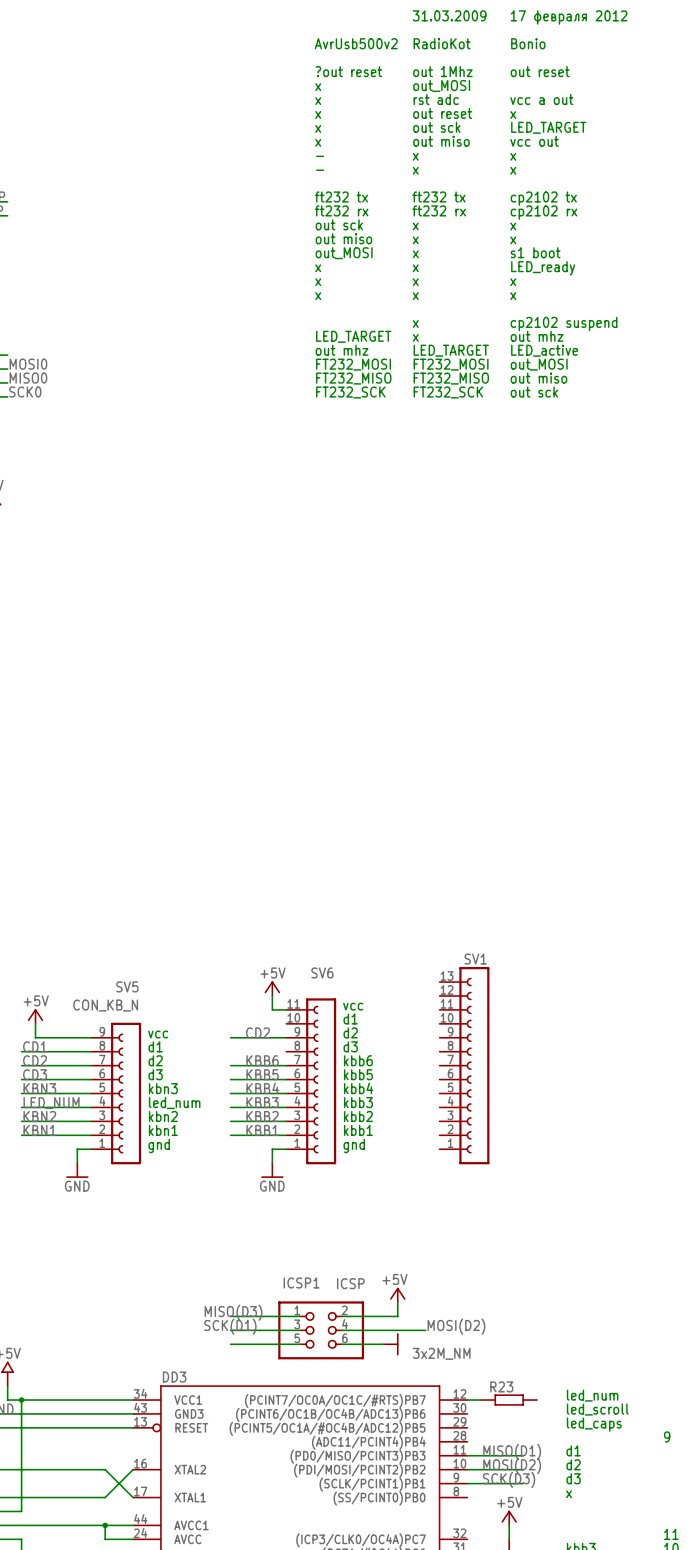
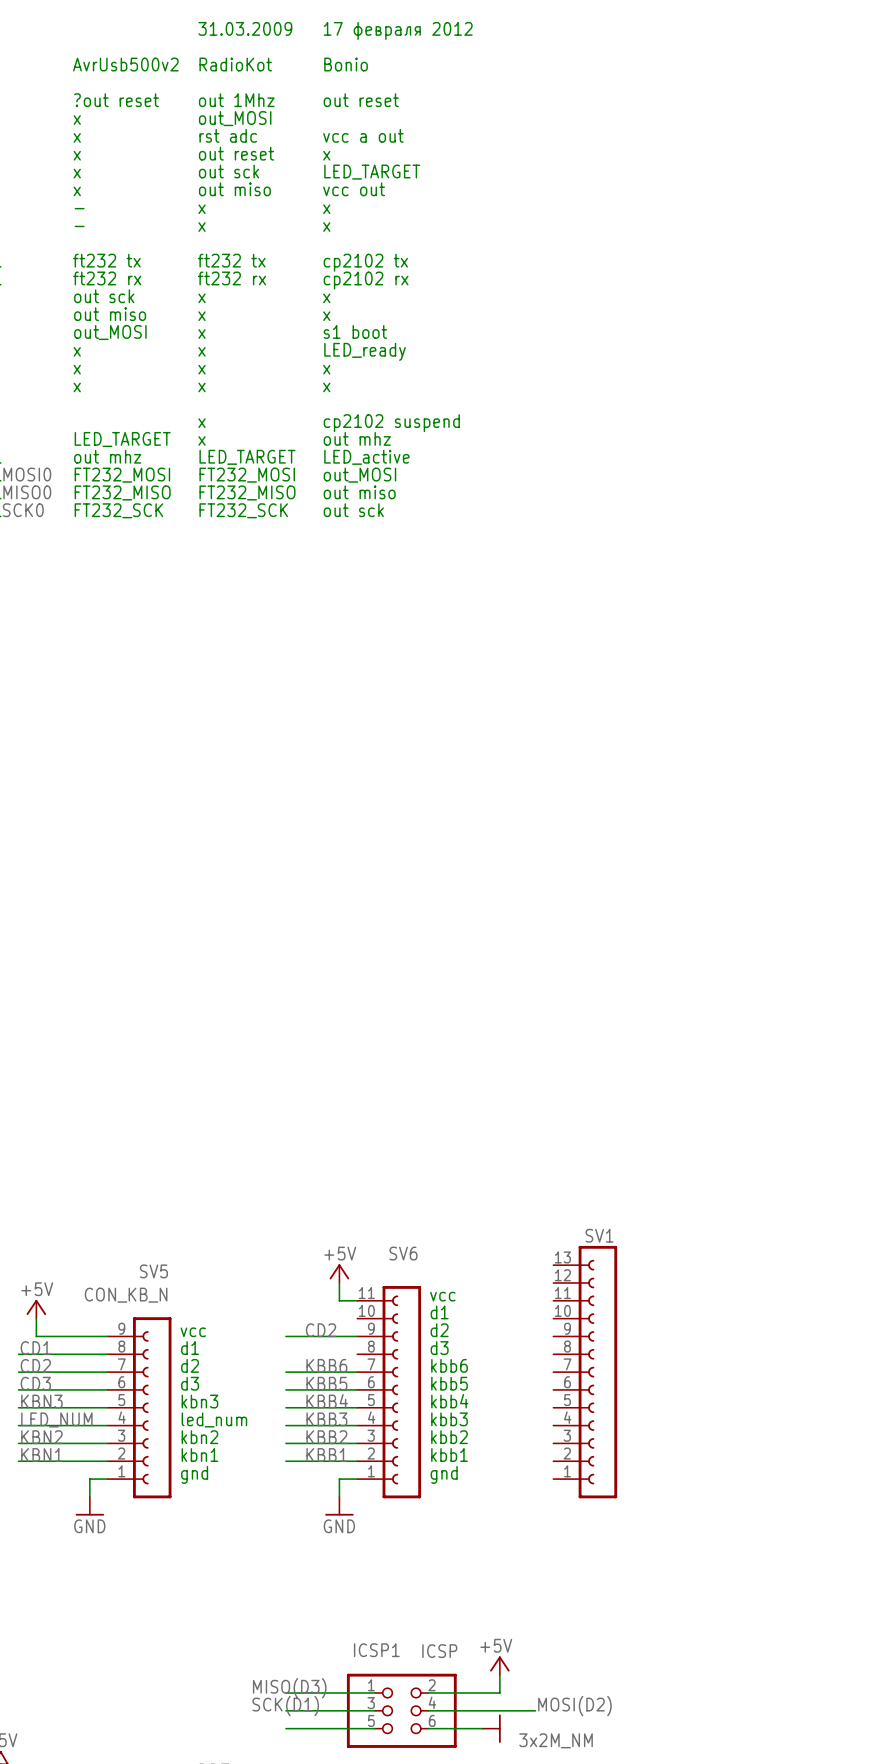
text: none -> 31.03.2009 (245, 28)
text: 31.03.2009 (449, 15) -> none
text: none -> 17 февраля 2012 (398, 30)
text: 17 февраля 2012 (569, 17) -> none
text: none -> AvrUsb500v2 (125, 64)
text: none -> RadioKot (235, 64)
text: none -> Bonio (346, 64)
text: AvrUsb500v2 (356, 43) -> none
text: RadioKot (442, 43) -> none
text: Bonio (528, 43) -> none
text: none -> ?out reset (116, 100)
text: none -> out 1Mhz (236, 100)
text: ?out reset (348, 71) -> out reset (361, 100)
text: out 1Mhz (442, 71) -> none
text: out reset (540, 71) -> none
text: none -> out_MOSI (235, 118)
text: out_MOSI (441, 85) -> none
text: none -> x (77, 120)
text: x (318, 87) -> none
text: none -> rst adc (228, 135)
text: none -> vcc a out (363, 135)
text: rst adc (436, 99) -> none
text: vcc a out (541, 99) -> none
text: none -> x (77, 137)
text: x (318, 101) -> none
text: none -> out reset (236, 153)
text: out reset (442, 113) -> none
text: none -> x (77, 155)
text: none -> x (326, 155)
text: x (318, 115) -> none
text: x (513, 115) -> none
text: none -> out sck (229, 171)
text: none -> LED_TARGET (372, 172)
text: out sck (436, 127) -> none
text: LED_TARGET (548, 127) -> none
text: none -> x (77, 173)
text: x (318, 128) -> none
text: none -> out miso (234, 189)
text: none -> vcc out (354, 189)
text: out miso (441, 141) -> none
text: vcc out (534, 141) -> none
text: none -> x (77, 191)
text: x (318, 142) -> none
text: none -> - (79, 208)
text: none -> x (202, 209)
text: none -> x (326, 209)
text: - (320, 156) -> none
text: x (415, 156) -> none
text: x (513, 156) -> none
text: none -> - (79, 226)
text: none -> x (202, 227)
text: none -> x (326, 227)
text: - (320, 170) -> none
text: x (415, 170) -> none
text: x (513, 170) -> none
text: none -> ft232 tx (106, 260)
text: none -> ft232 tx (231, 260)
text: ft232 tx (341, 196) -> none
text: ft232 tx (438, 196) -> none
text: none -> cp2102 tx (365, 262)
text: cp2102 tx (543, 198) -> none
text: none -> ft232 rx (107, 278)
text: none -> ft232 rx (231, 278)
text: ft232 rx (341, 210) -> none
text: ft232 rx (439, 210) -> none
text: none -> cp2102 rx (366, 280)
text: cp2102 rx (544, 212) -> none
text: none -> out sck (104, 296)
text: out sck (339, 224) -> none
text: none -> x (202, 298)
text: none -> x (326, 298)
text: x (415, 226) -> none
text: x (513, 226) -> none
text: none -> out miso (110, 314)
text: out miso (343, 238) -> none
text: none -> x (202, 316)
text: none -> x (326, 316)
text: x (415, 240) -> none
text: x (513, 240) -> none
text: none -> s1 boot (355, 331)
text: s1 boot (535, 252) -> none
text: none -> out_MOSI (110, 332)
text: out_MOSI (344, 253) -> none
text: none -> x (202, 334)
text: x (415, 254) -> none
text: none -> x (77, 351)
text: none -> x (202, 351)
text: none -> LED_ready (365, 351)
text: x (318, 268) -> none
text: x (415, 268) -> none
text: LED_ready (543, 268) -> none
text: none -> x (77, 369)
text: none -> x (202, 369)
text: none -> x (326, 369)
text: x (318, 282) -> none
text: x (415, 282) -> none
text: x (513, 282) -> none
text: none -> x (77, 387)
text: none -> x (202, 387)
text: none -> x (326, 387)
text: x (318, 296) -> none
text: x (415, 296) -> none
text: x (513, 296) -> none
text: none -> x (202, 423)
text: none -> cp2102 suspend (391, 423)
text: x (415, 324) -> none
text: cp2102 suspend (564, 324) -> none
text: none -> LED_TARGET (122, 439)
text: LED_TARGET (353, 336) -> none
text: out mhz (537, 336) -> none
text: none -> x (202, 440)
text: x (415, 337) -> none
text: none -> out mhz (107, 456)
text: none -> LED_TARGET (247, 457)
text: none -> LED_active (366, 457)
text position: out mhz (342, 350) -> out mhz (357, 438)
text: LED_TARGET (451, 350) -> none
text: LED_active (544, 350) -> none
text: none -> FT232_MOSI (122, 475)
text: none -> FT232_MOSI (247, 475)
text: none -> out_MOSI (359, 475)
text: FT232_MOSI (353, 364) -> none
text: FT232_MOSI (451, 364) -> none
text: out_MOSI (539, 364) -> none
text: none -> FT232_MISO (122, 492)
text: none -> FT232_MISO (247, 492)
text: none -> out miso (359, 492)
text: FT232_MISO (353, 378) -> none
text: FT232_MISO (451, 378) -> none
text: out miso (538, 378) -> none
text: none -> FT232_SCK (118, 510)
text: none -> FT232_SCK (243, 510)
text: none -> out sck (353, 510)
text: FT232_SCK (350, 392) -> none
text: FT232_SCK (448, 392) -> none
text: out sck (534, 392) -> none

